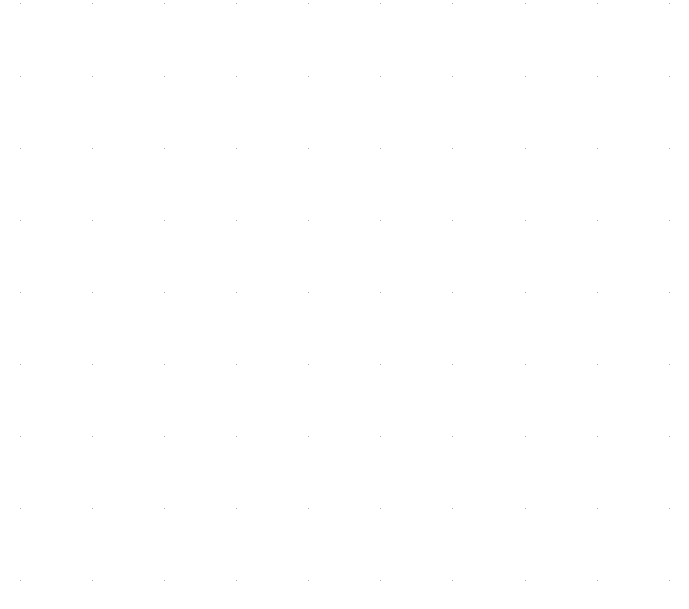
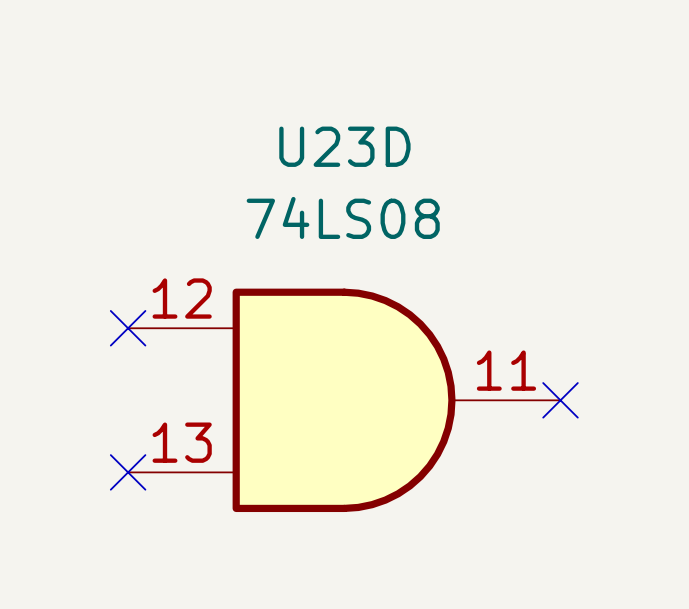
no-connect mark: none -> (128, 328)
U23D: none -> 74LS08 (344, 400)
no-connect mark: none -> (560, 400)
no-connect mark: none -> (128, 472)

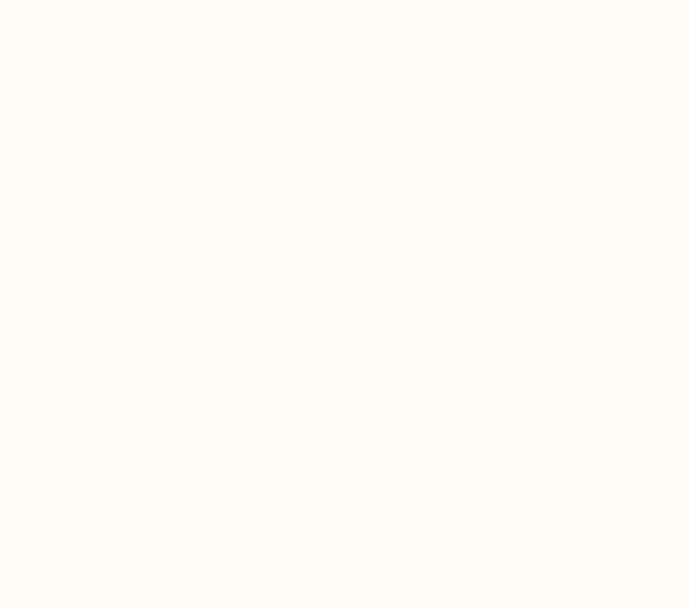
no-connect mark: (128, 328) -> none
U23D: 74LS08 (344, 400) -> none
no-connect mark: (560, 400) -> none
no-connect mark: (128, 472) -> none

